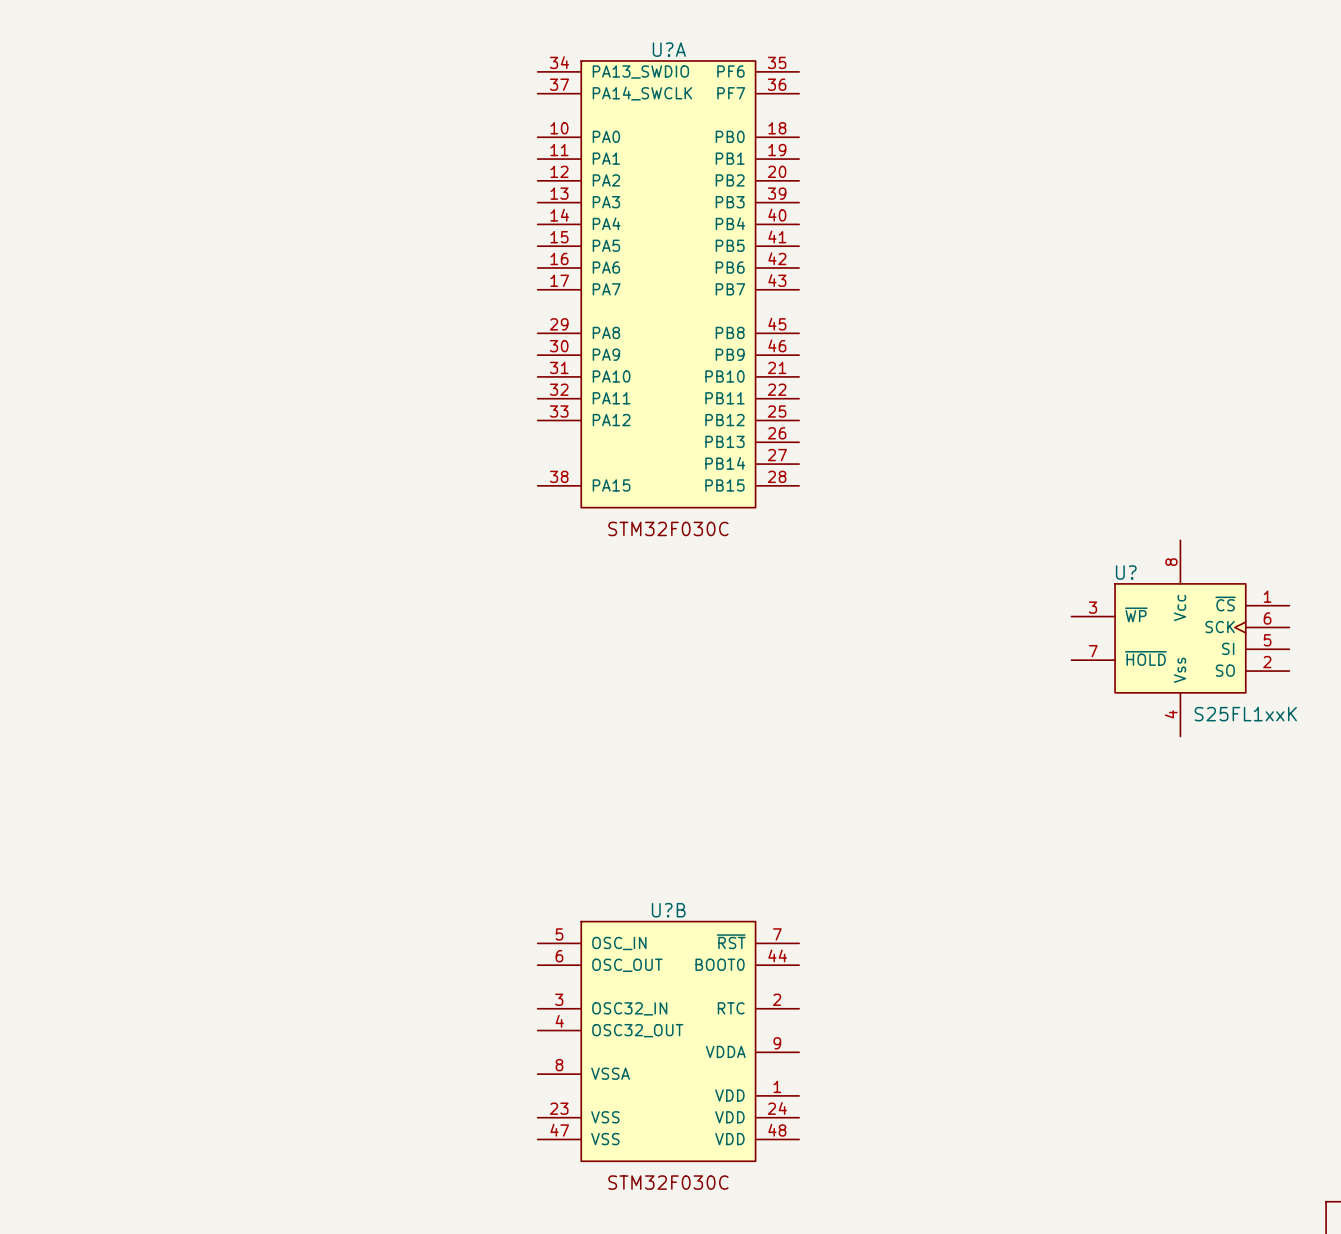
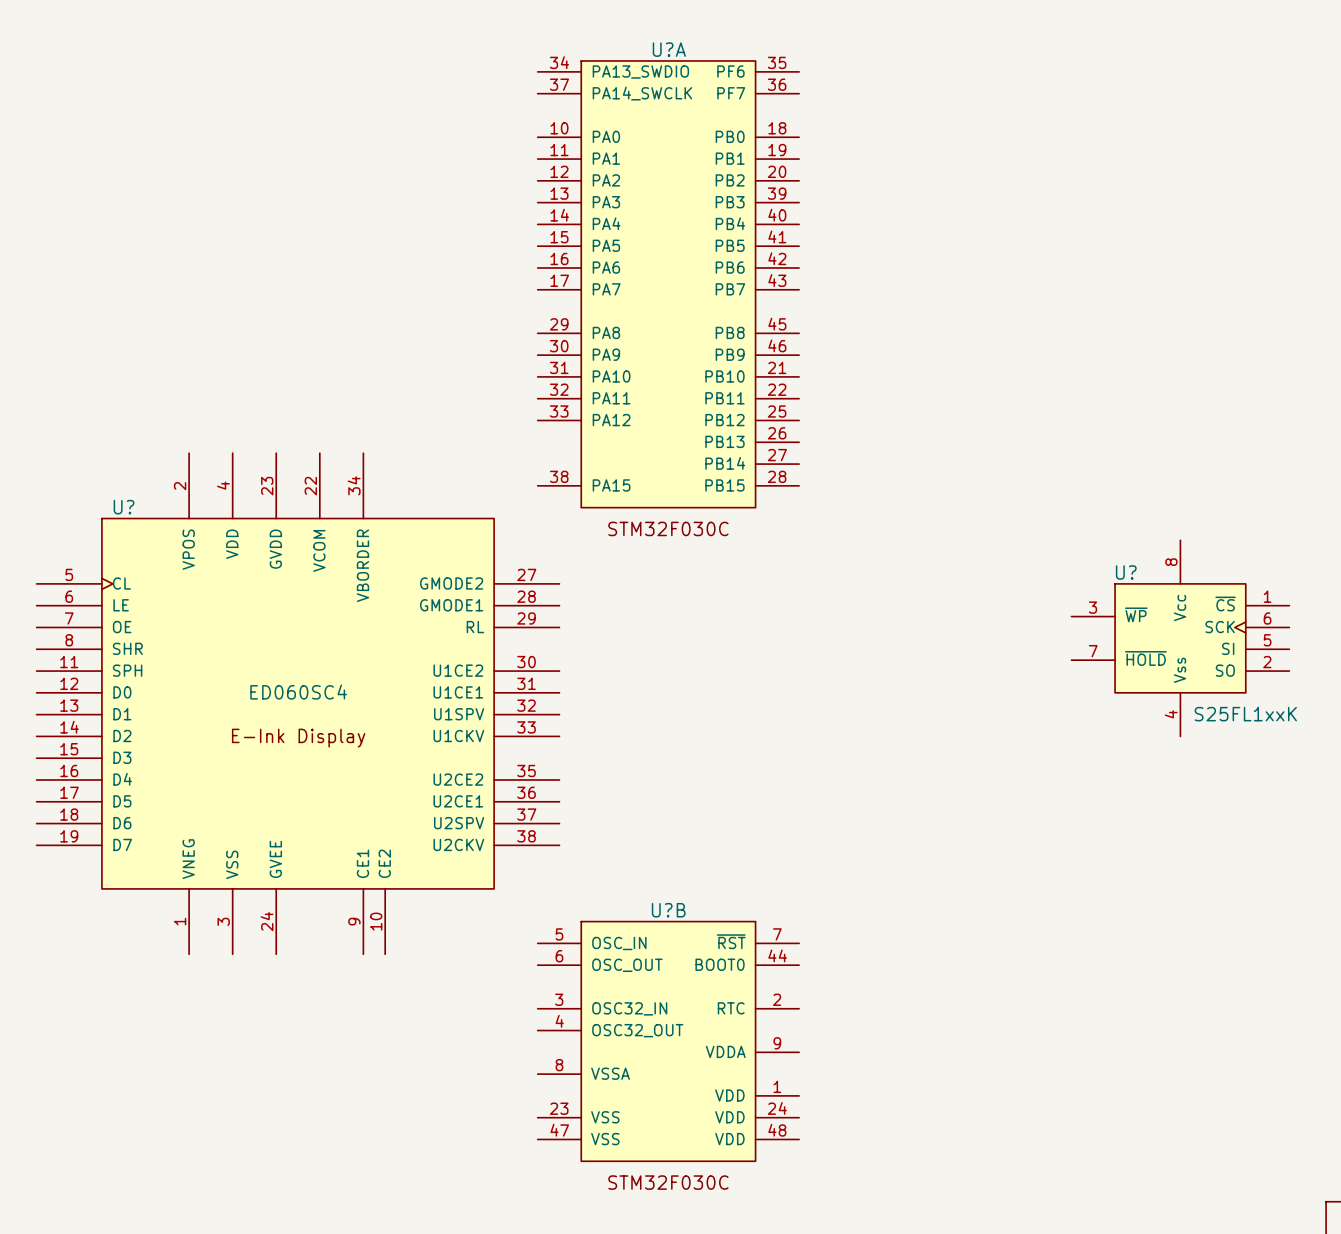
U?: none -> ED060SC4 (298, 703)

